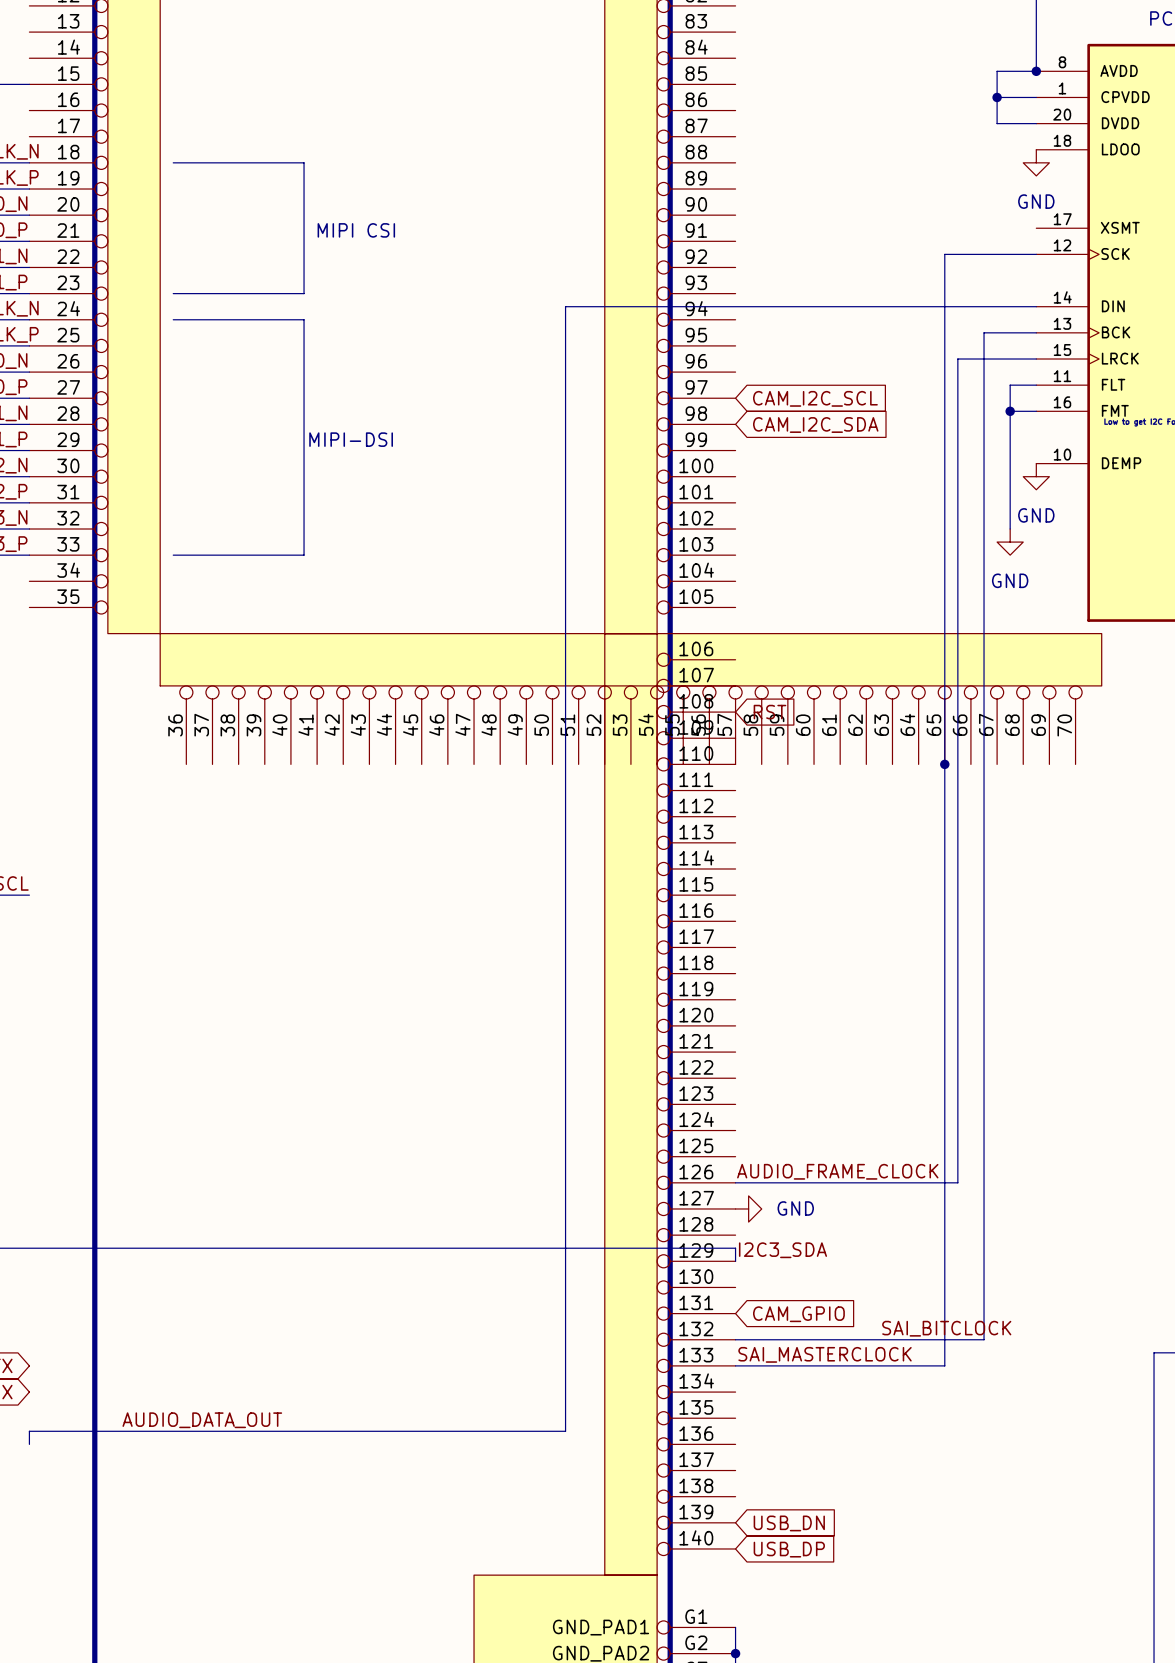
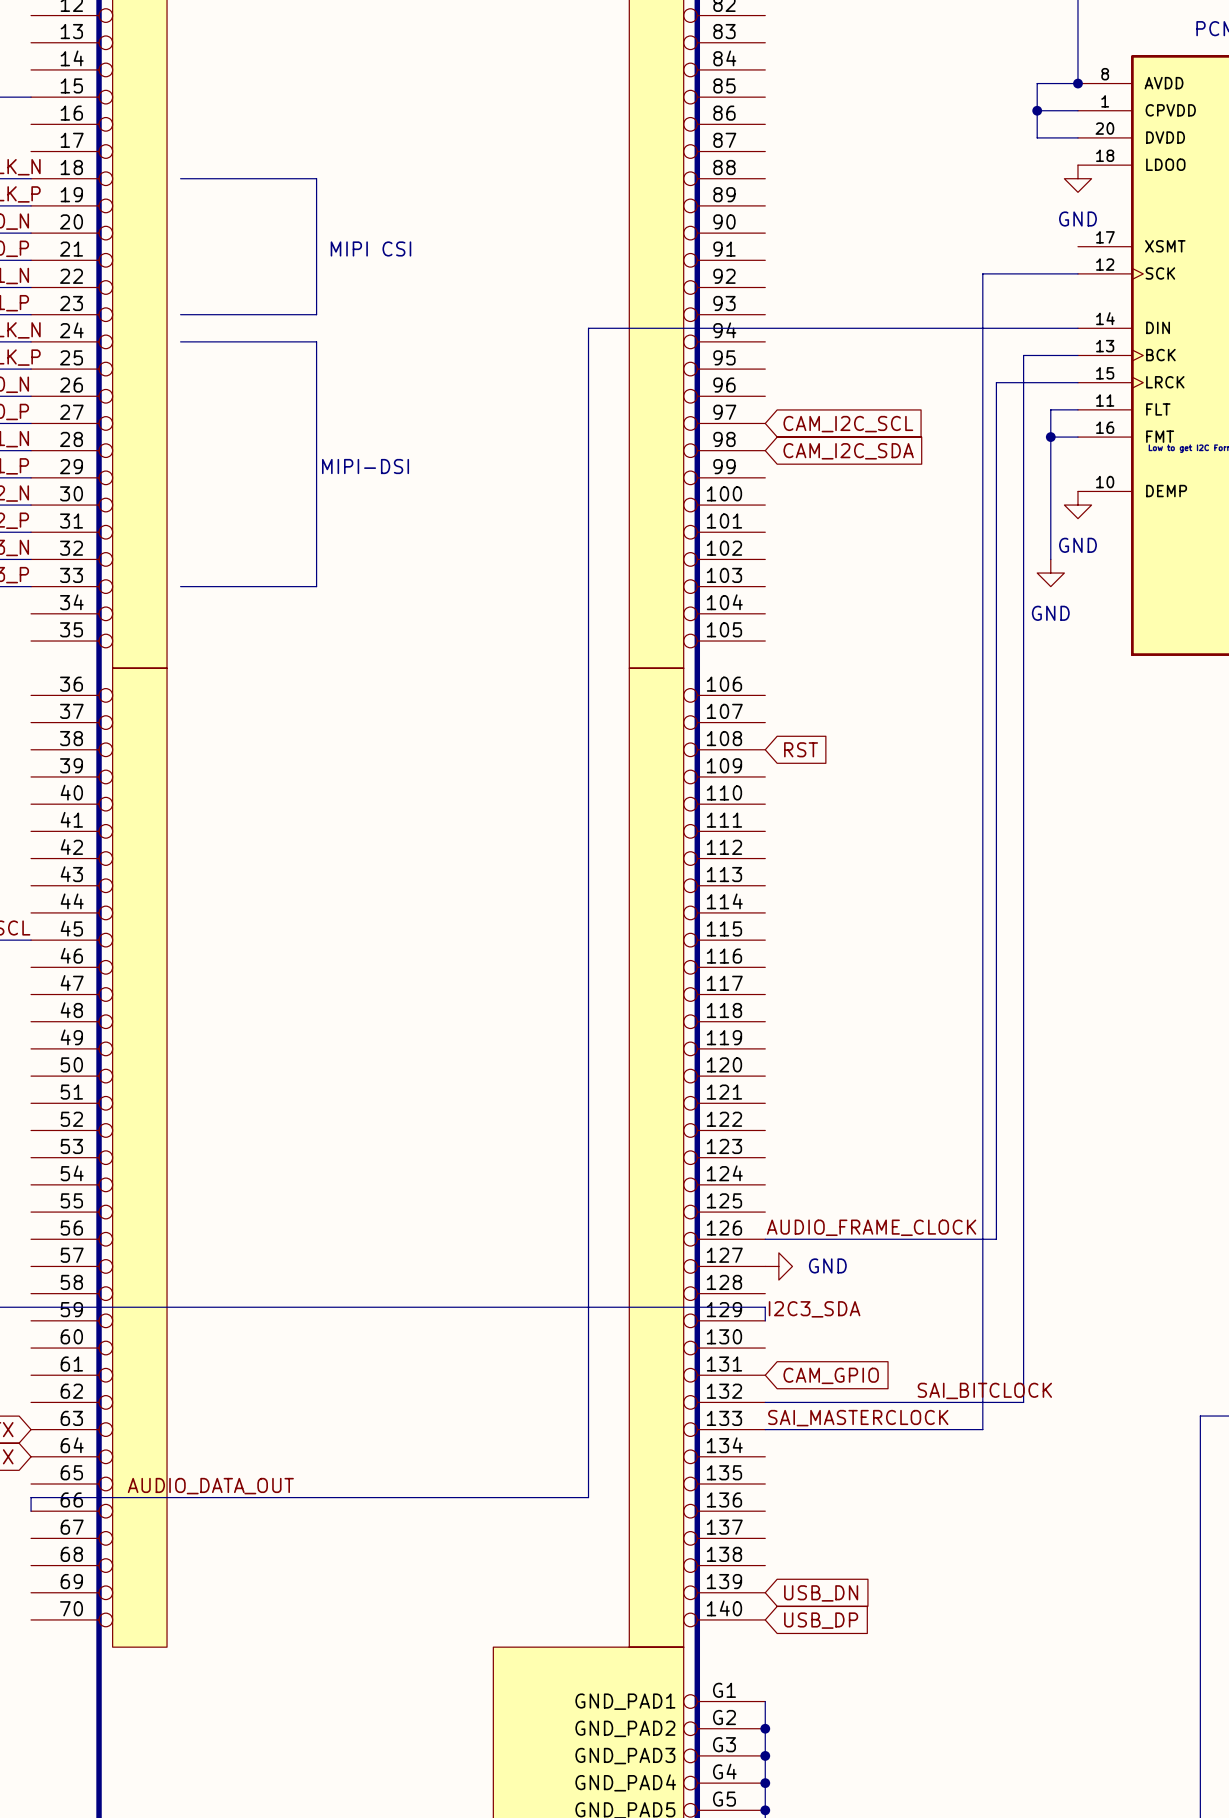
part: (630, 698) -> none
junction: (944, 764) -> none
part: none -> (99, 1157)

